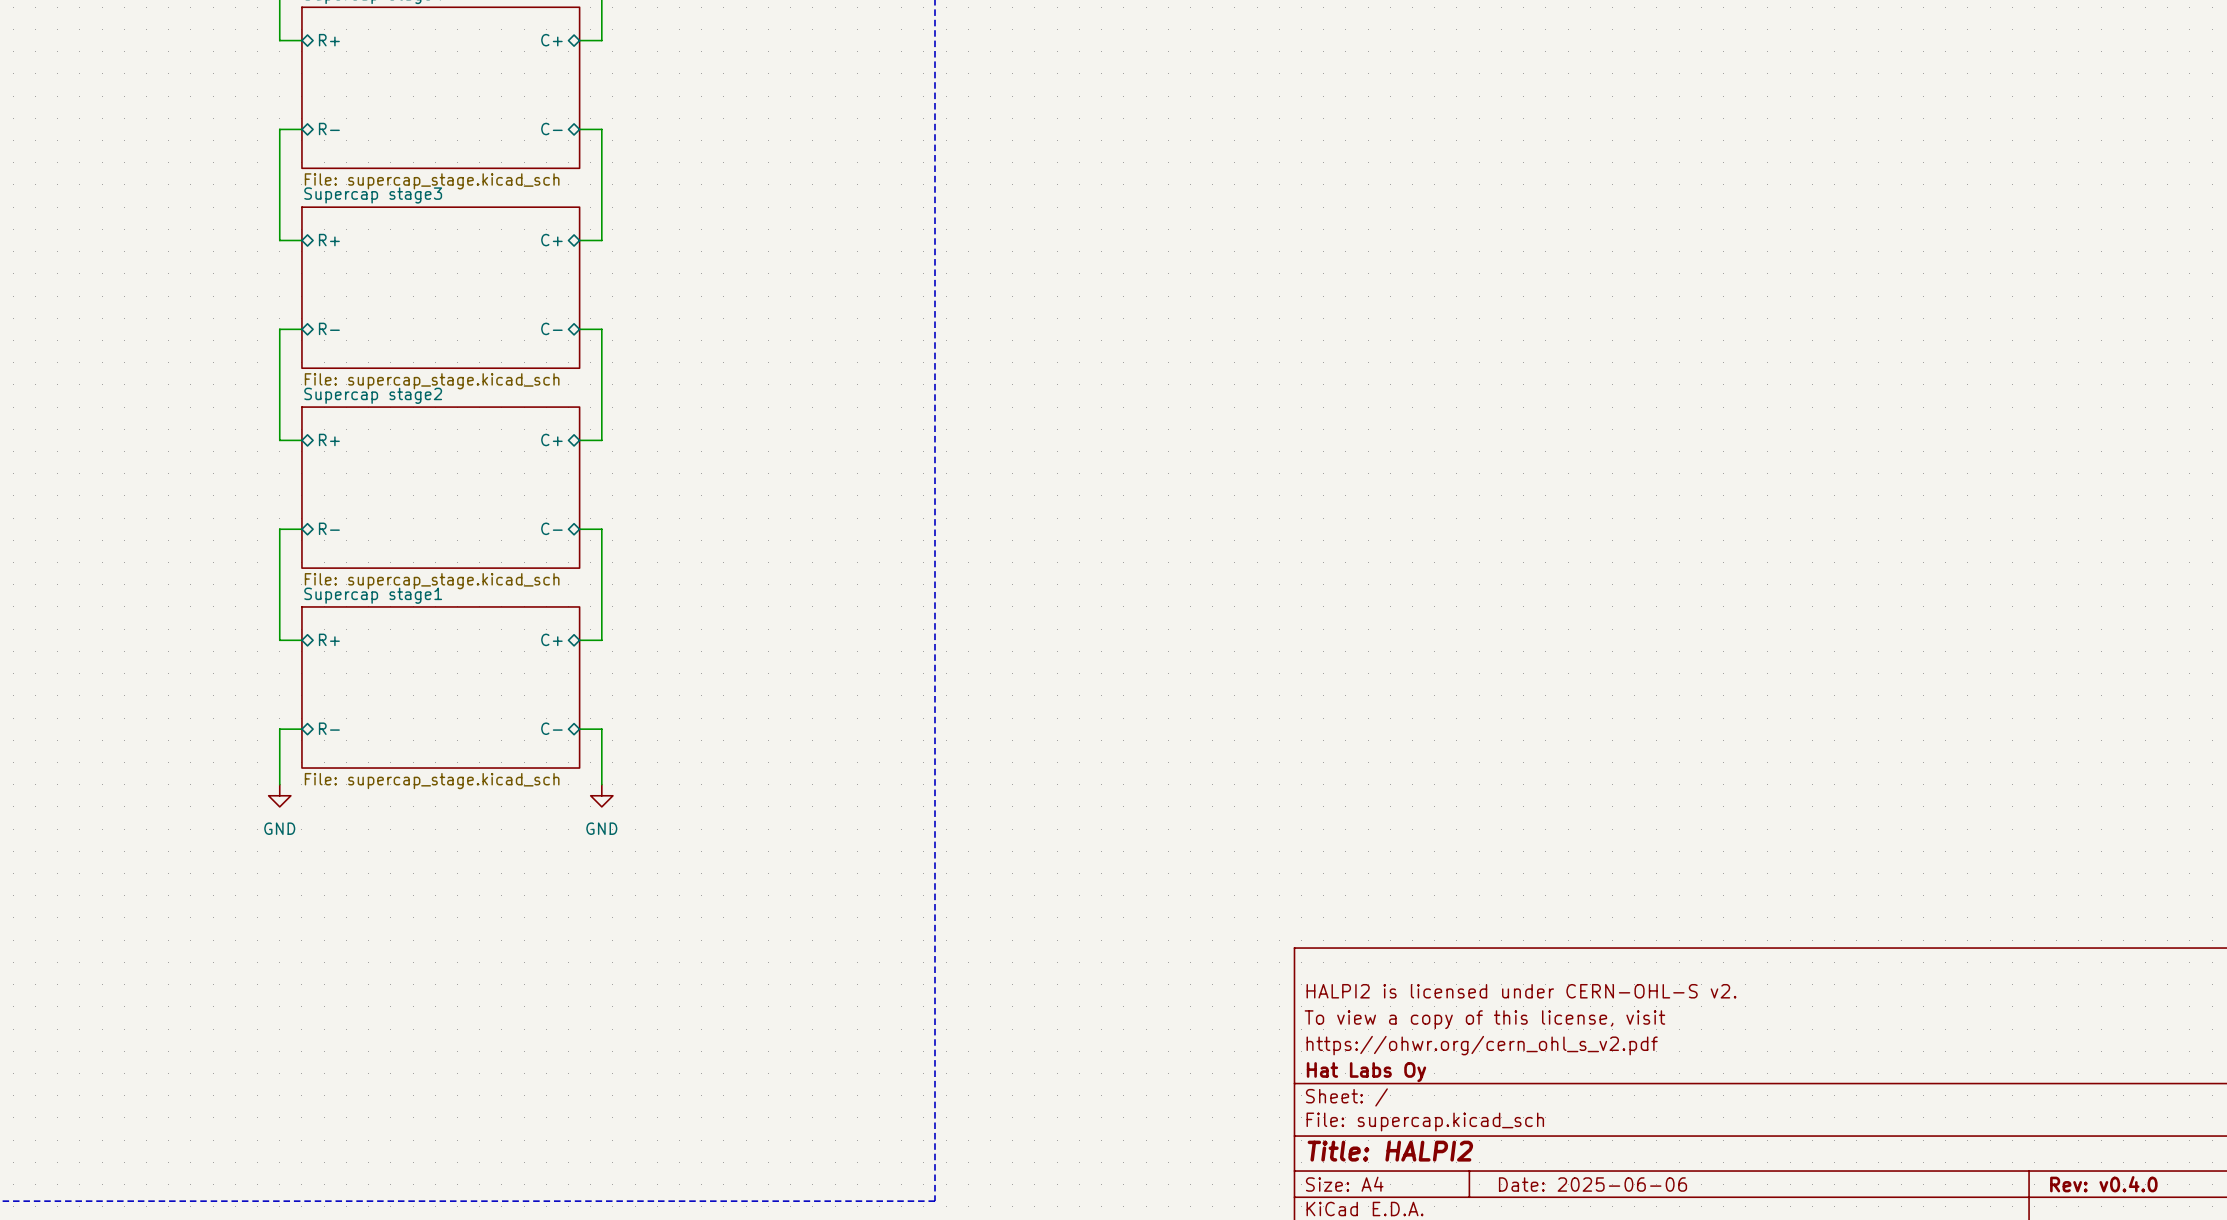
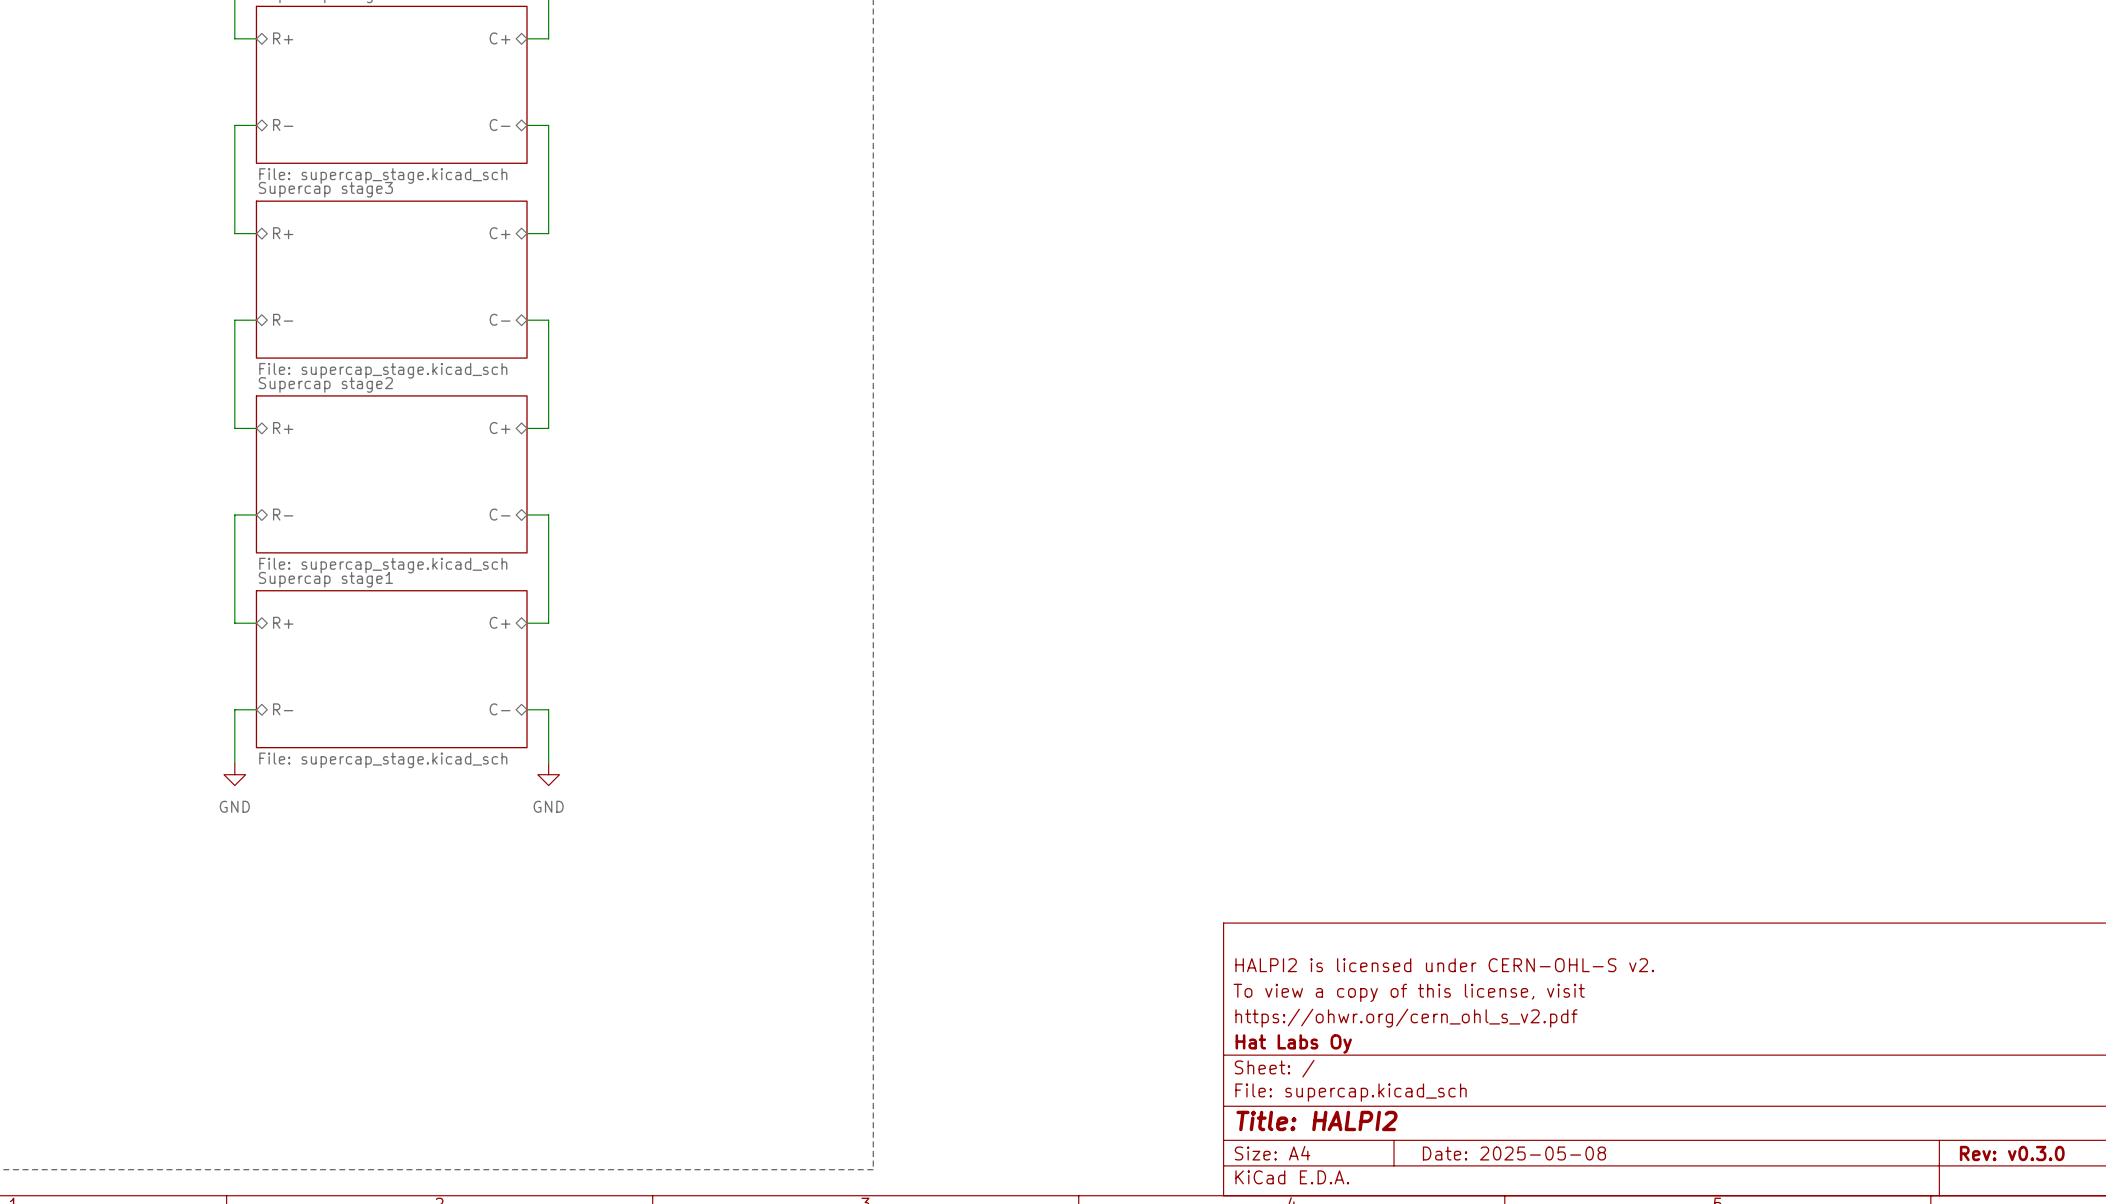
title block: Date: 2025-06-06 (1593, 1184) -> Date: 2025-05-08 (1514, 1153)
title block: Rev: v0.4.0 (2103, 1184) -> Rev: v0.3.0 (2012, 1153)

